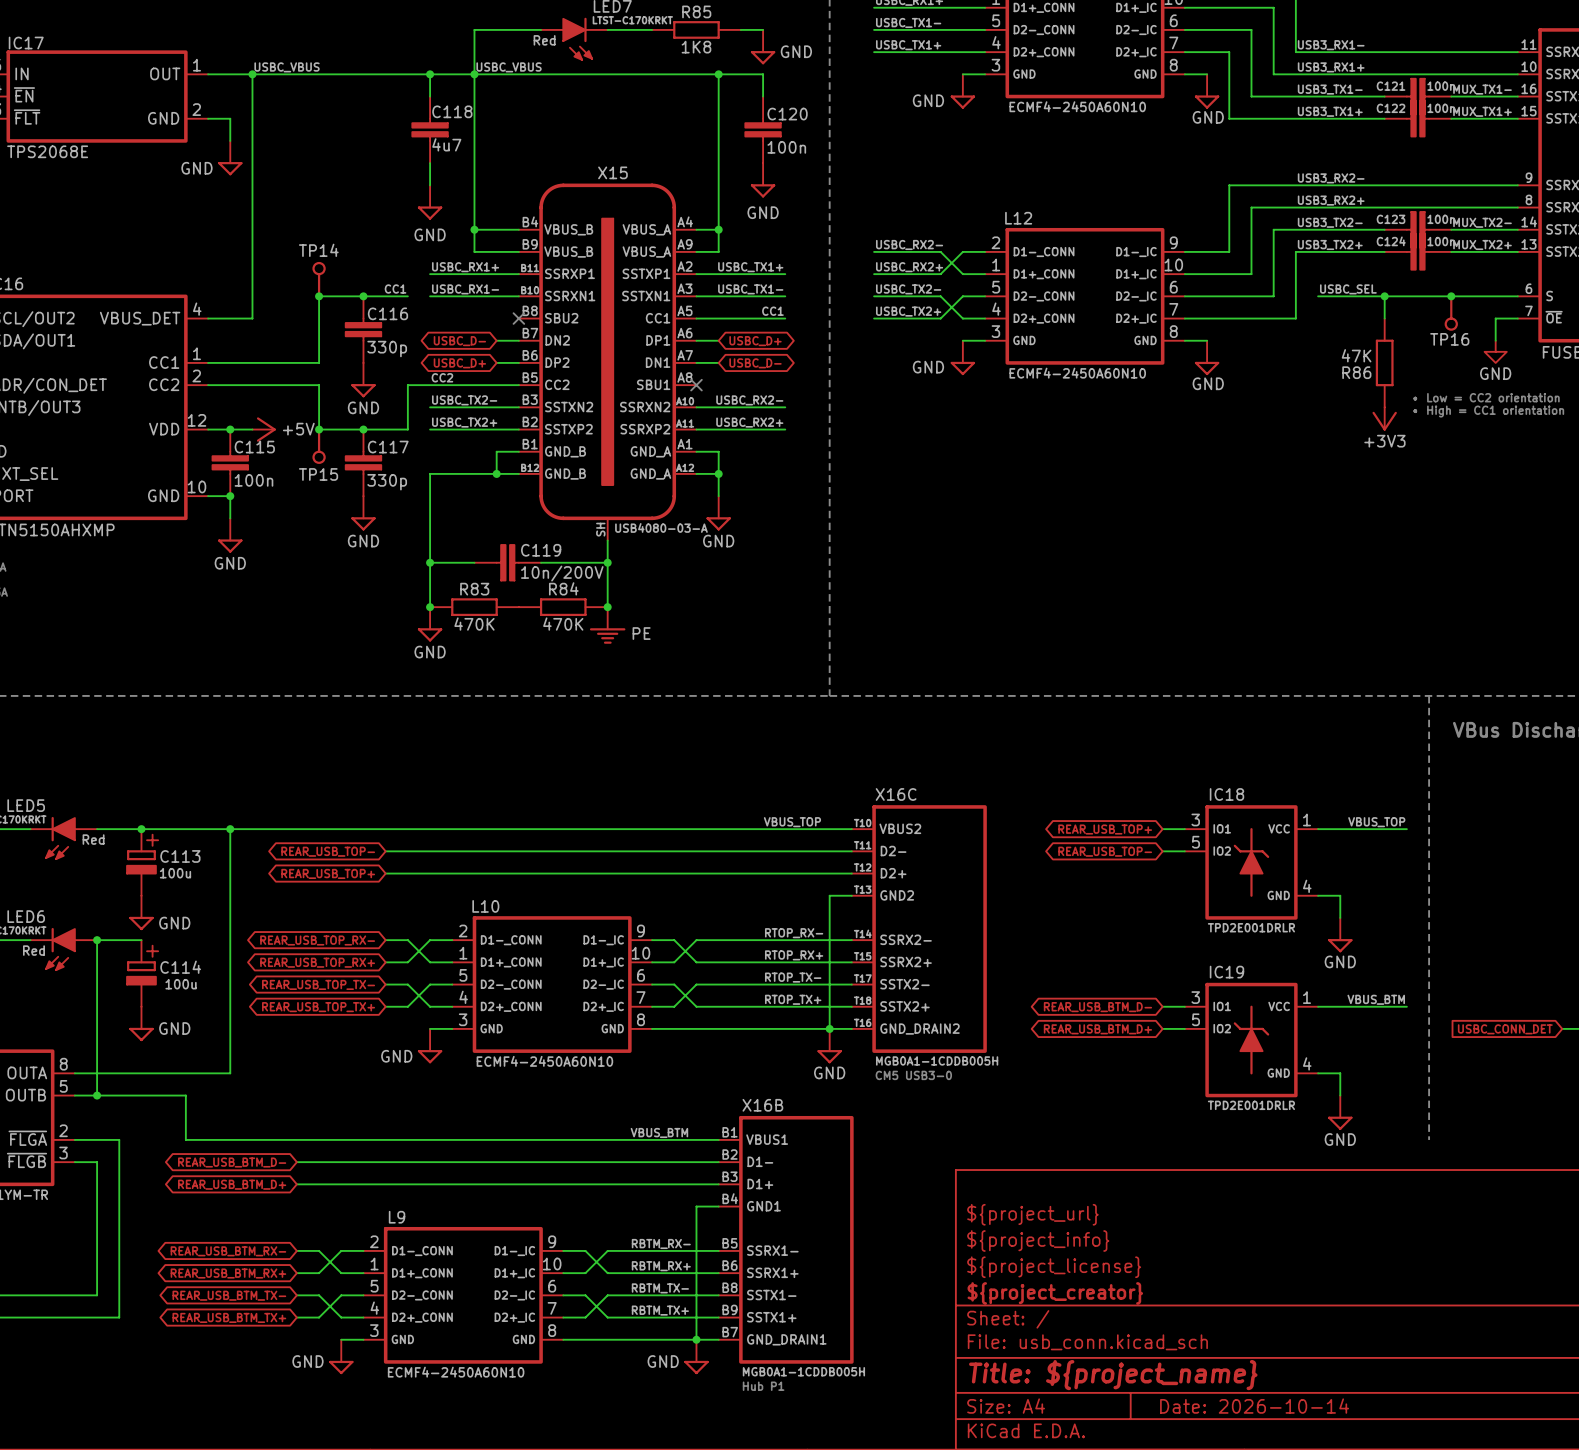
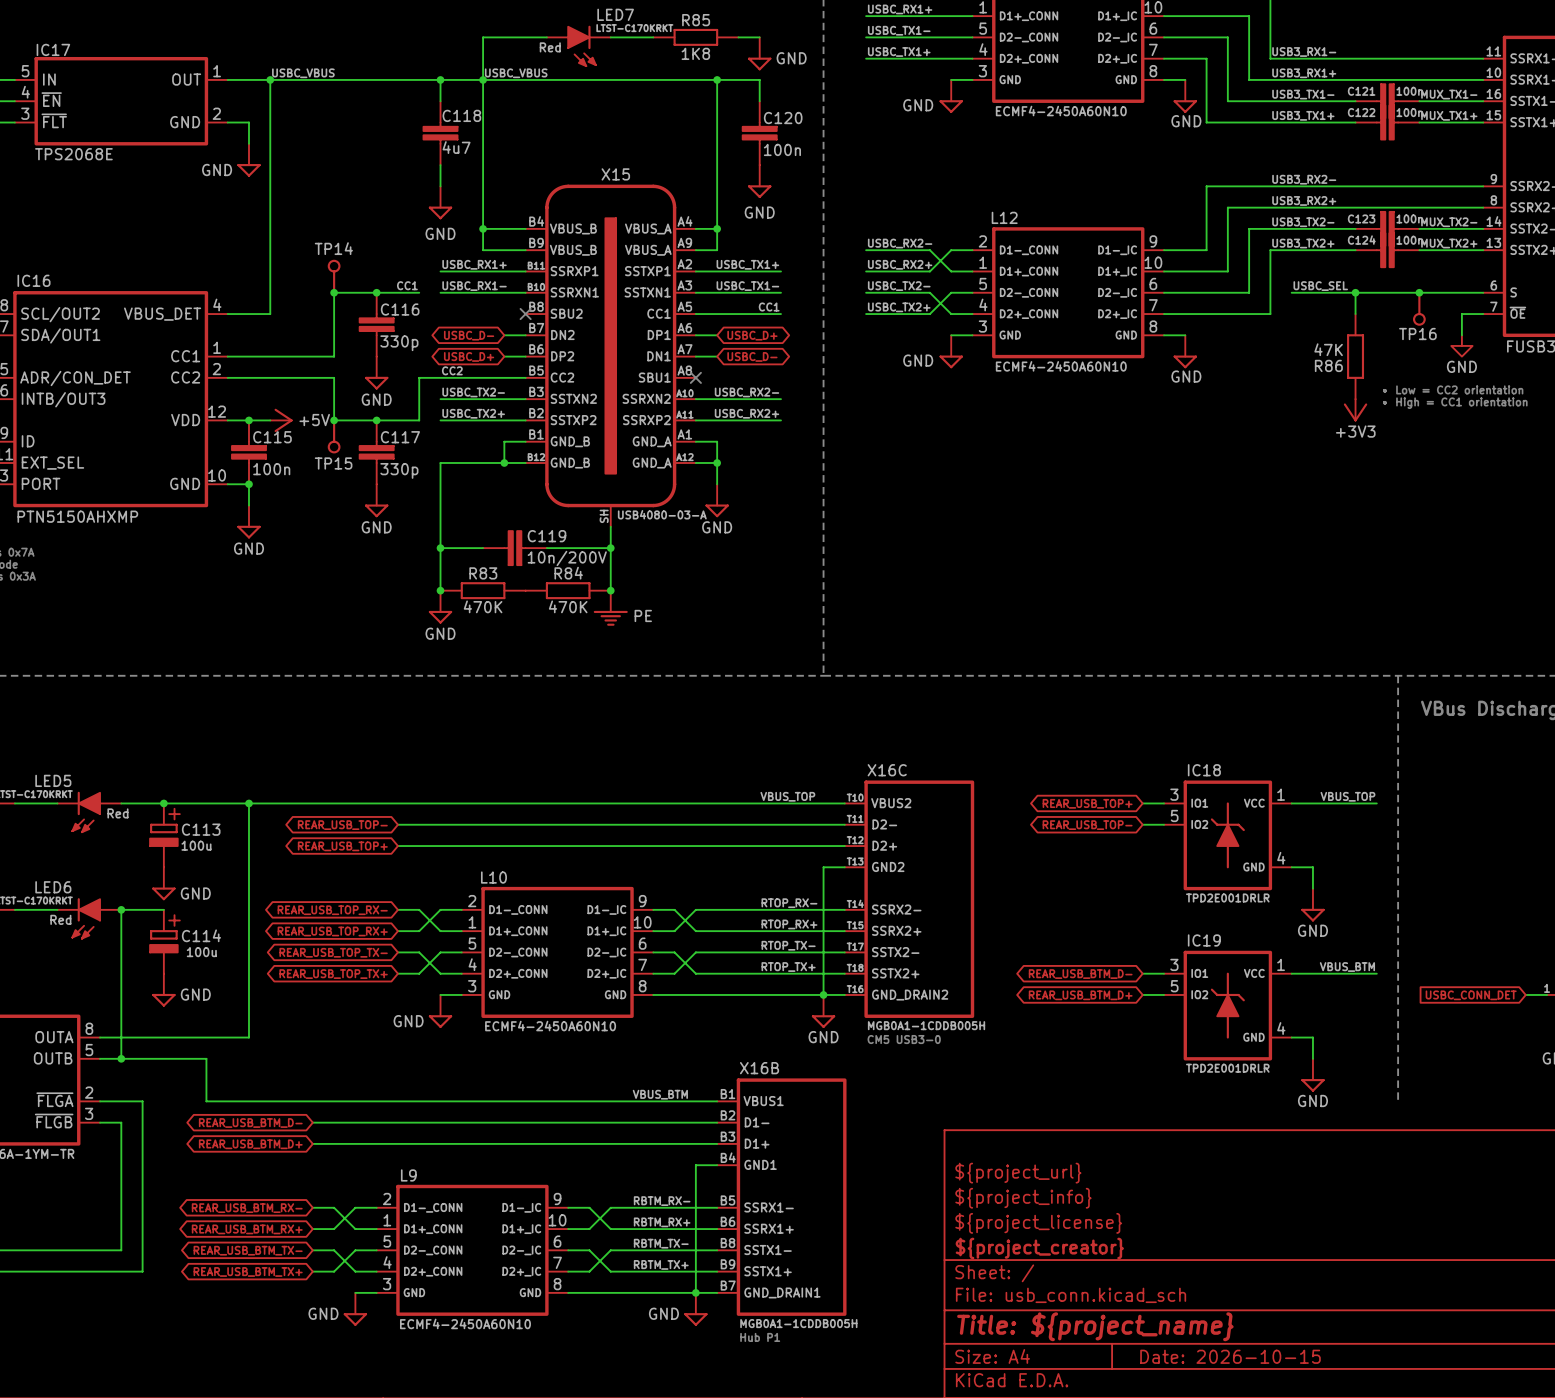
title block: Date: 2026-10-14 (1254, 1406) -> Date: 2026-10-15 (1230, 1356)

